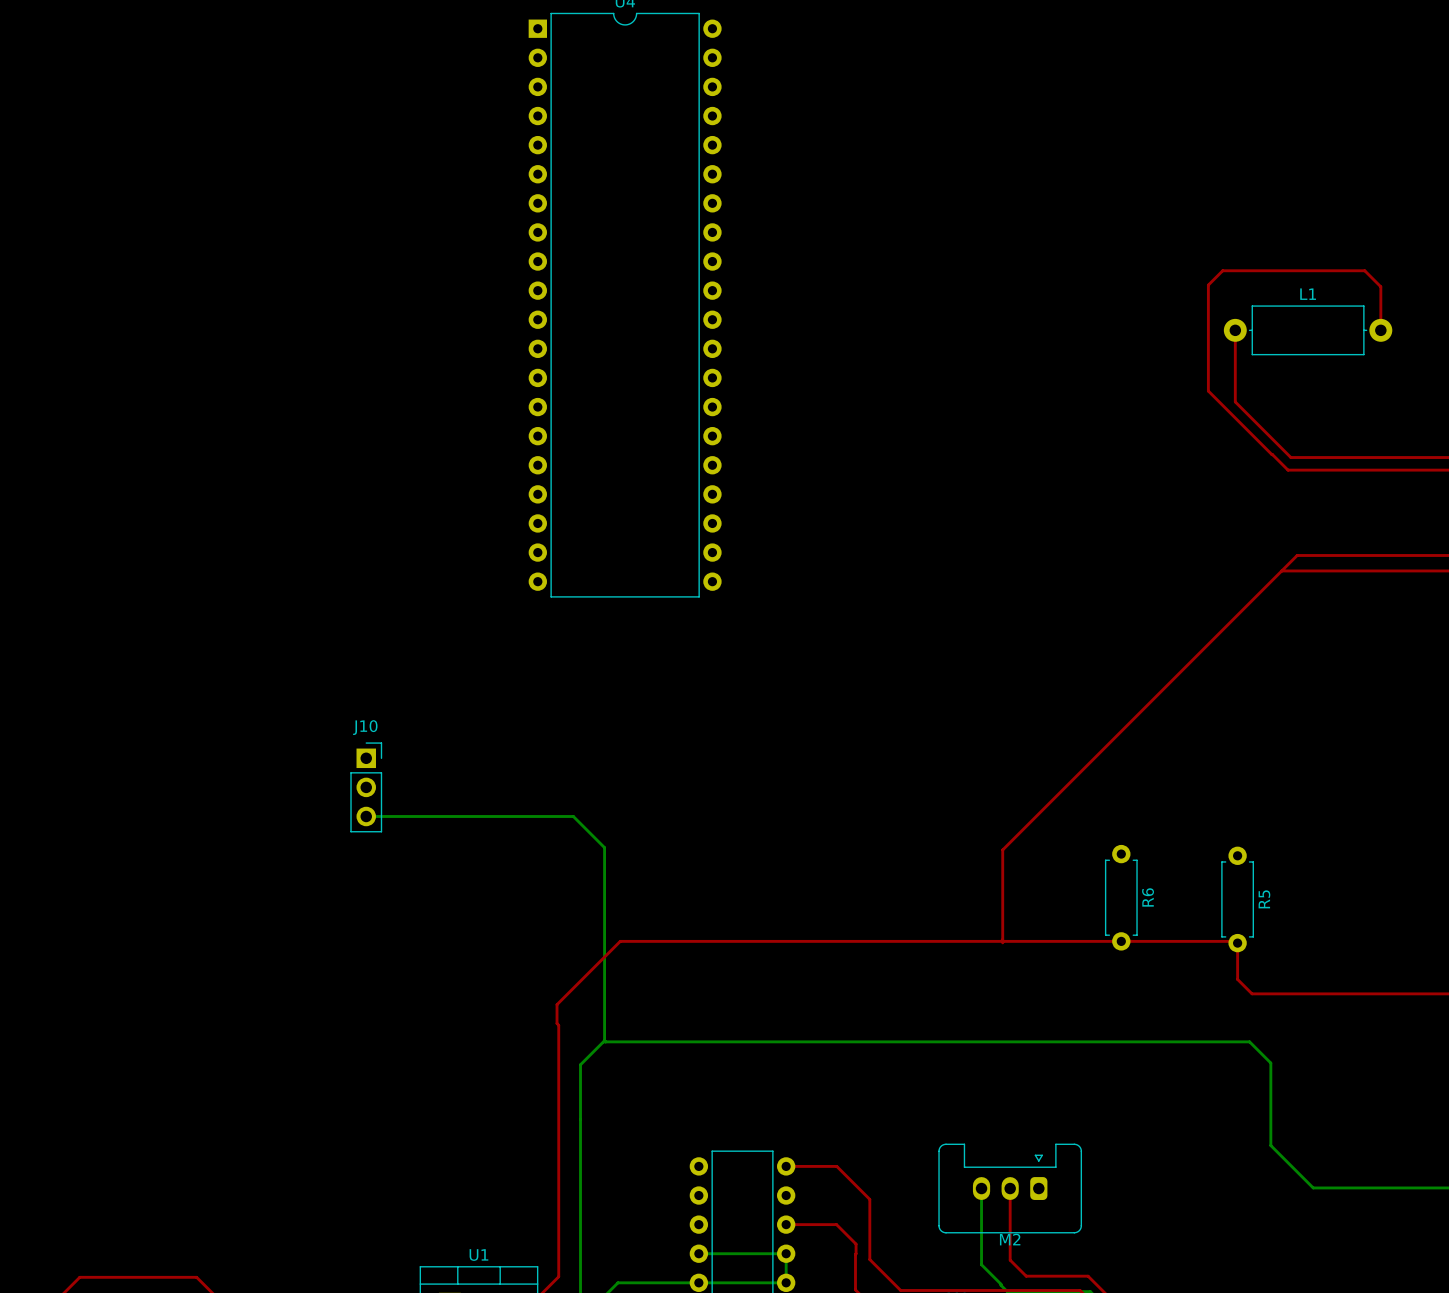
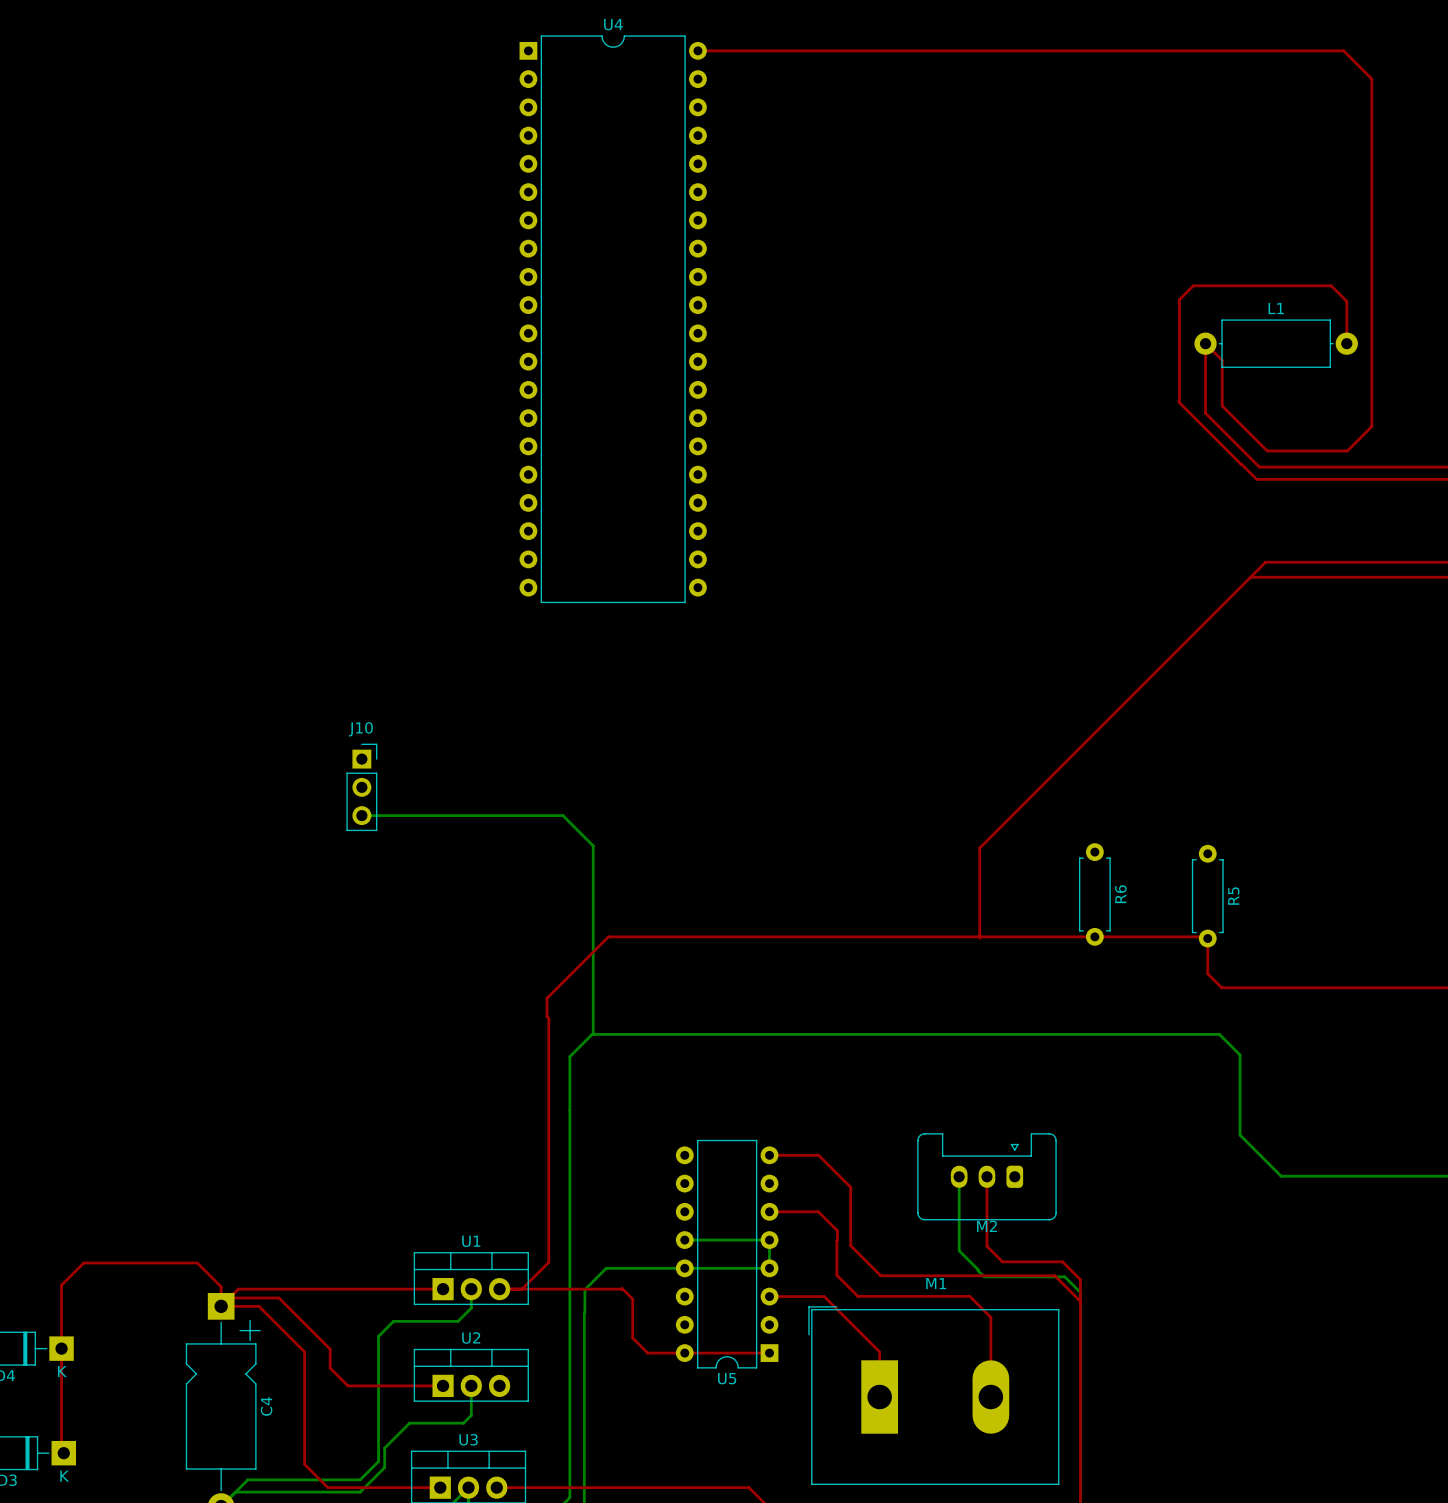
top track: none -> (697, 50) (1343, 50) (1371, 78) (1371, 426) (1347, 451) (1267, 451) (1222, 405) (1222, 360) (1205, 343)

